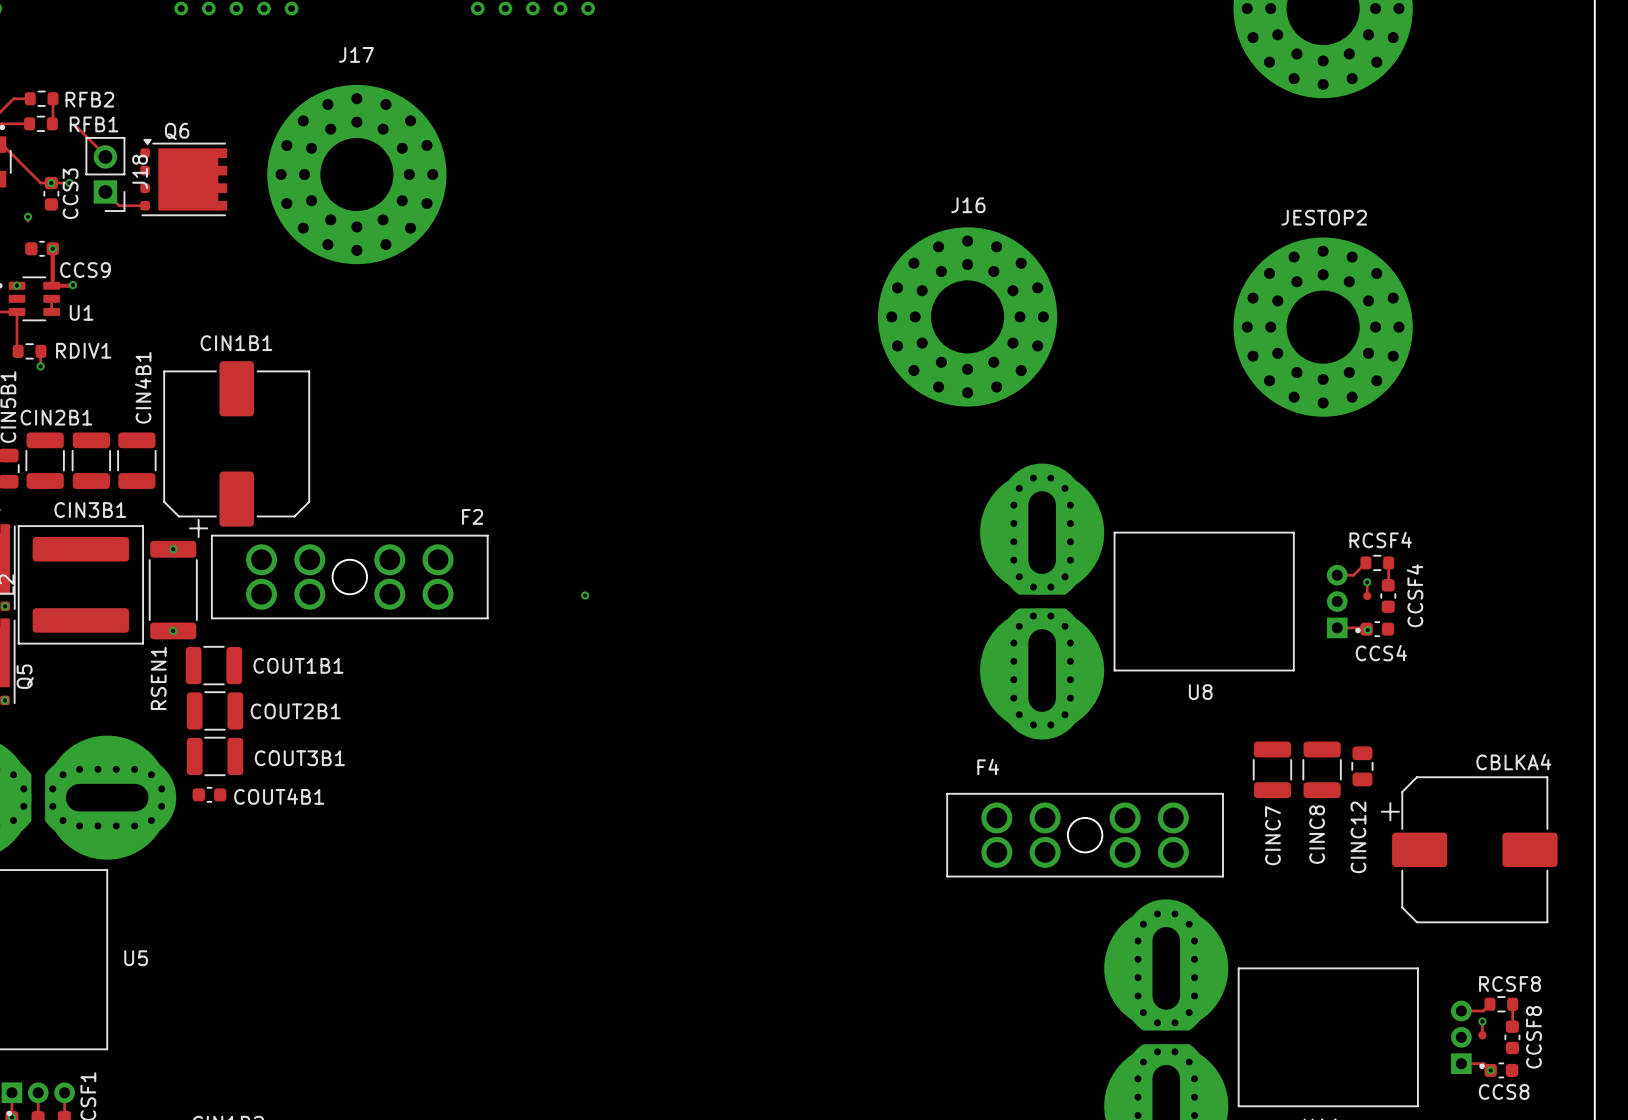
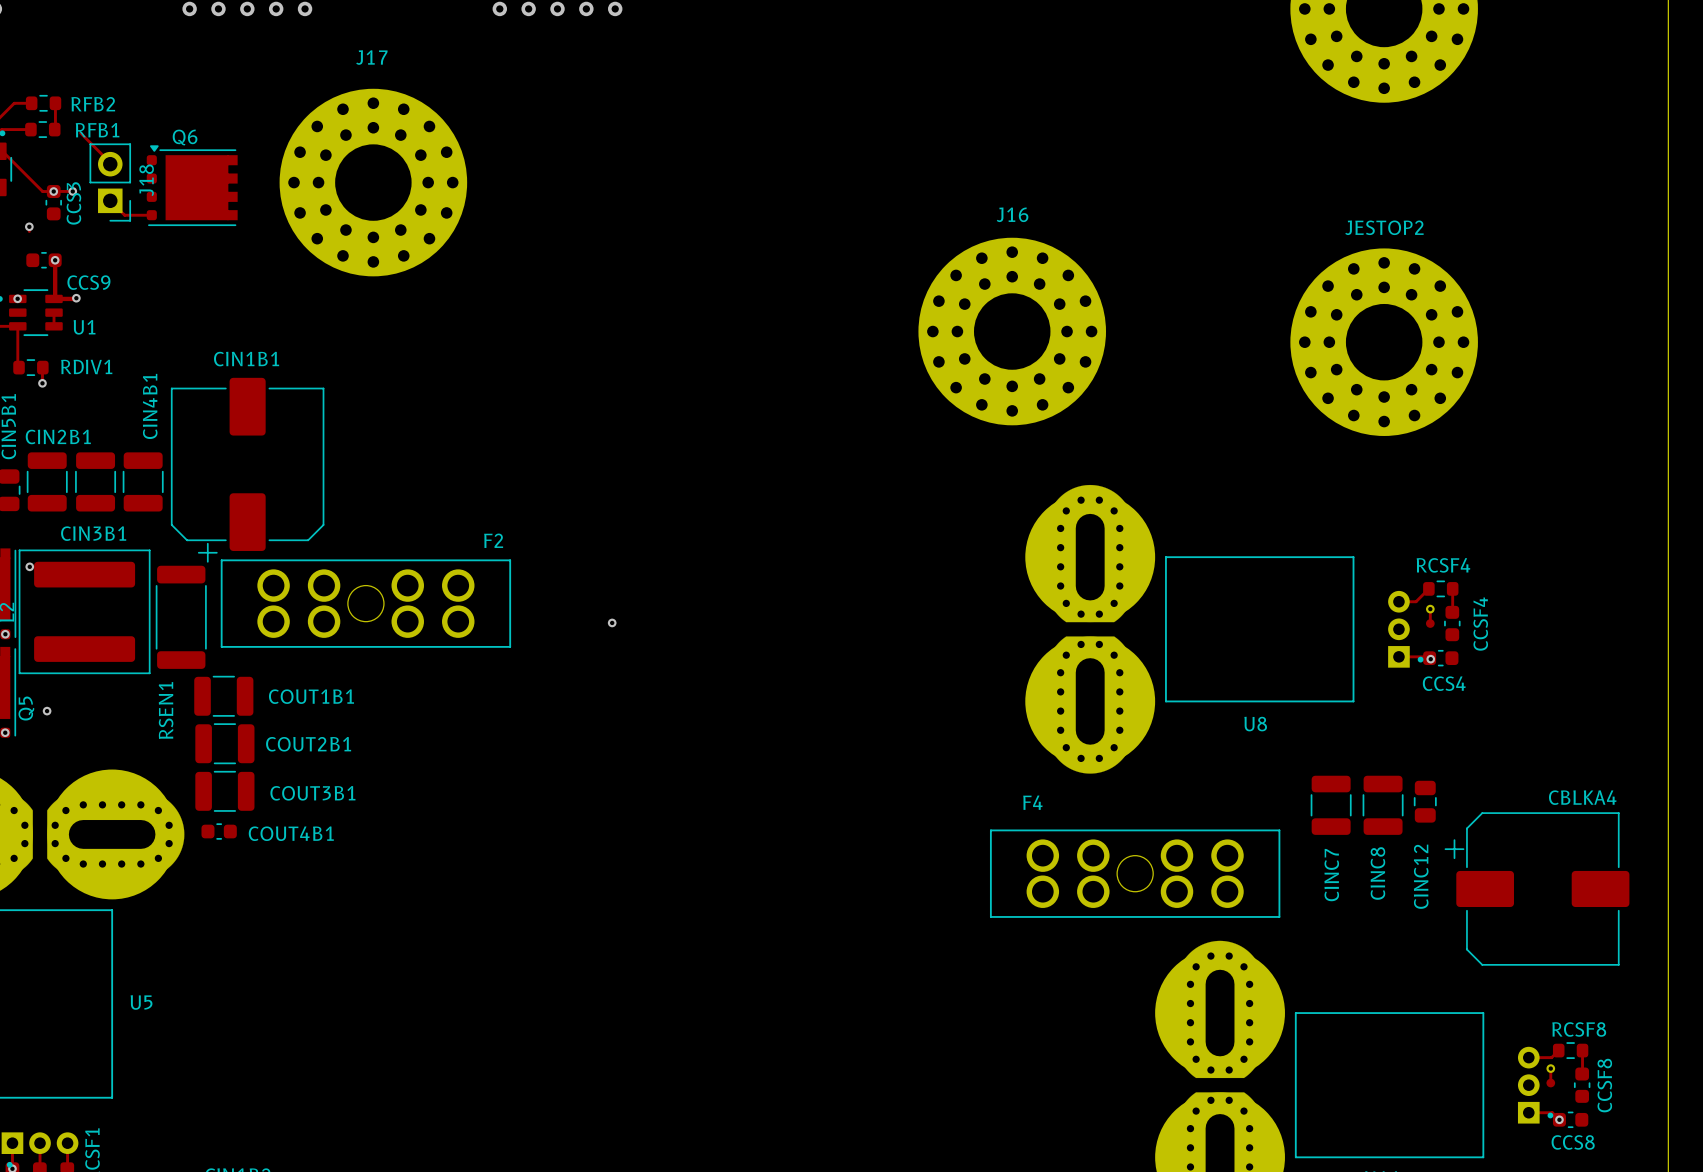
via: none -> (29, 566)
via: (173, 549) -> none
via: (173, 630) -> none
via: none -> (47, 711)

